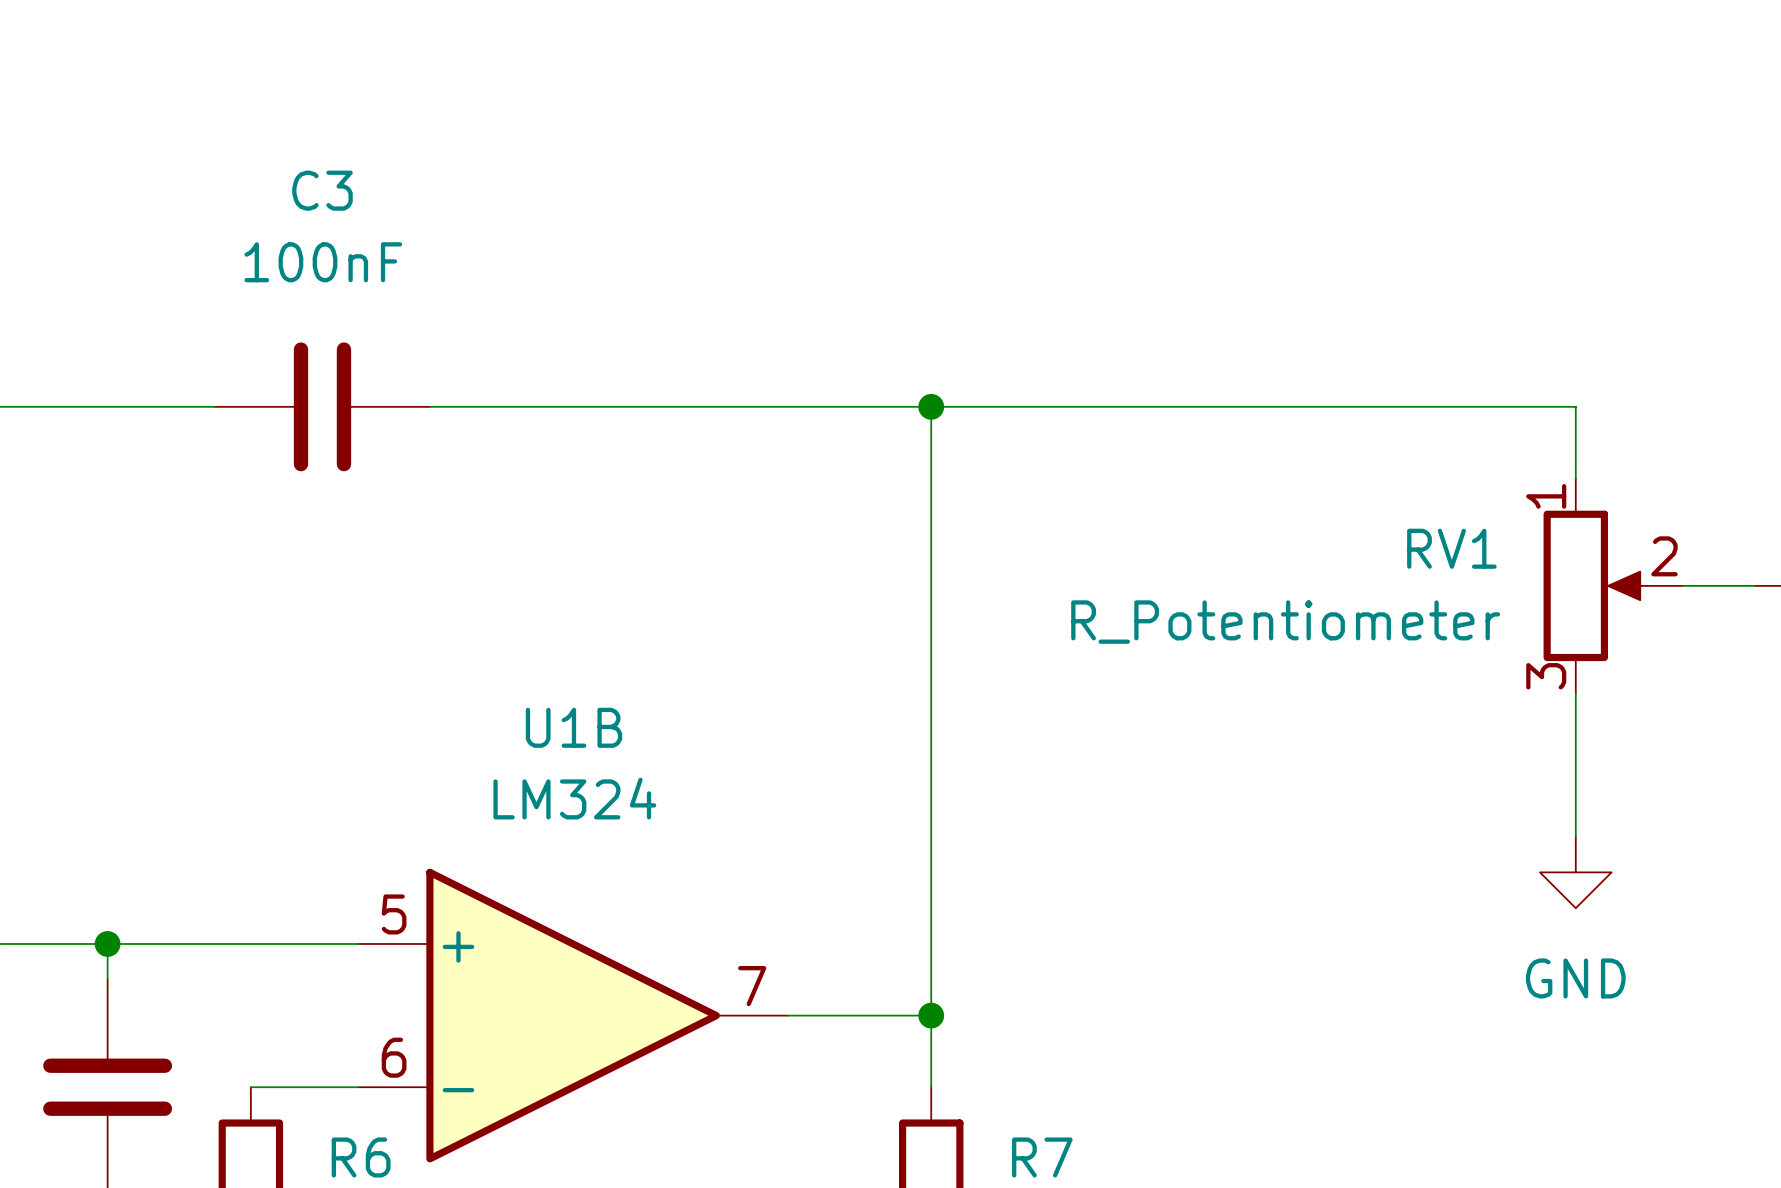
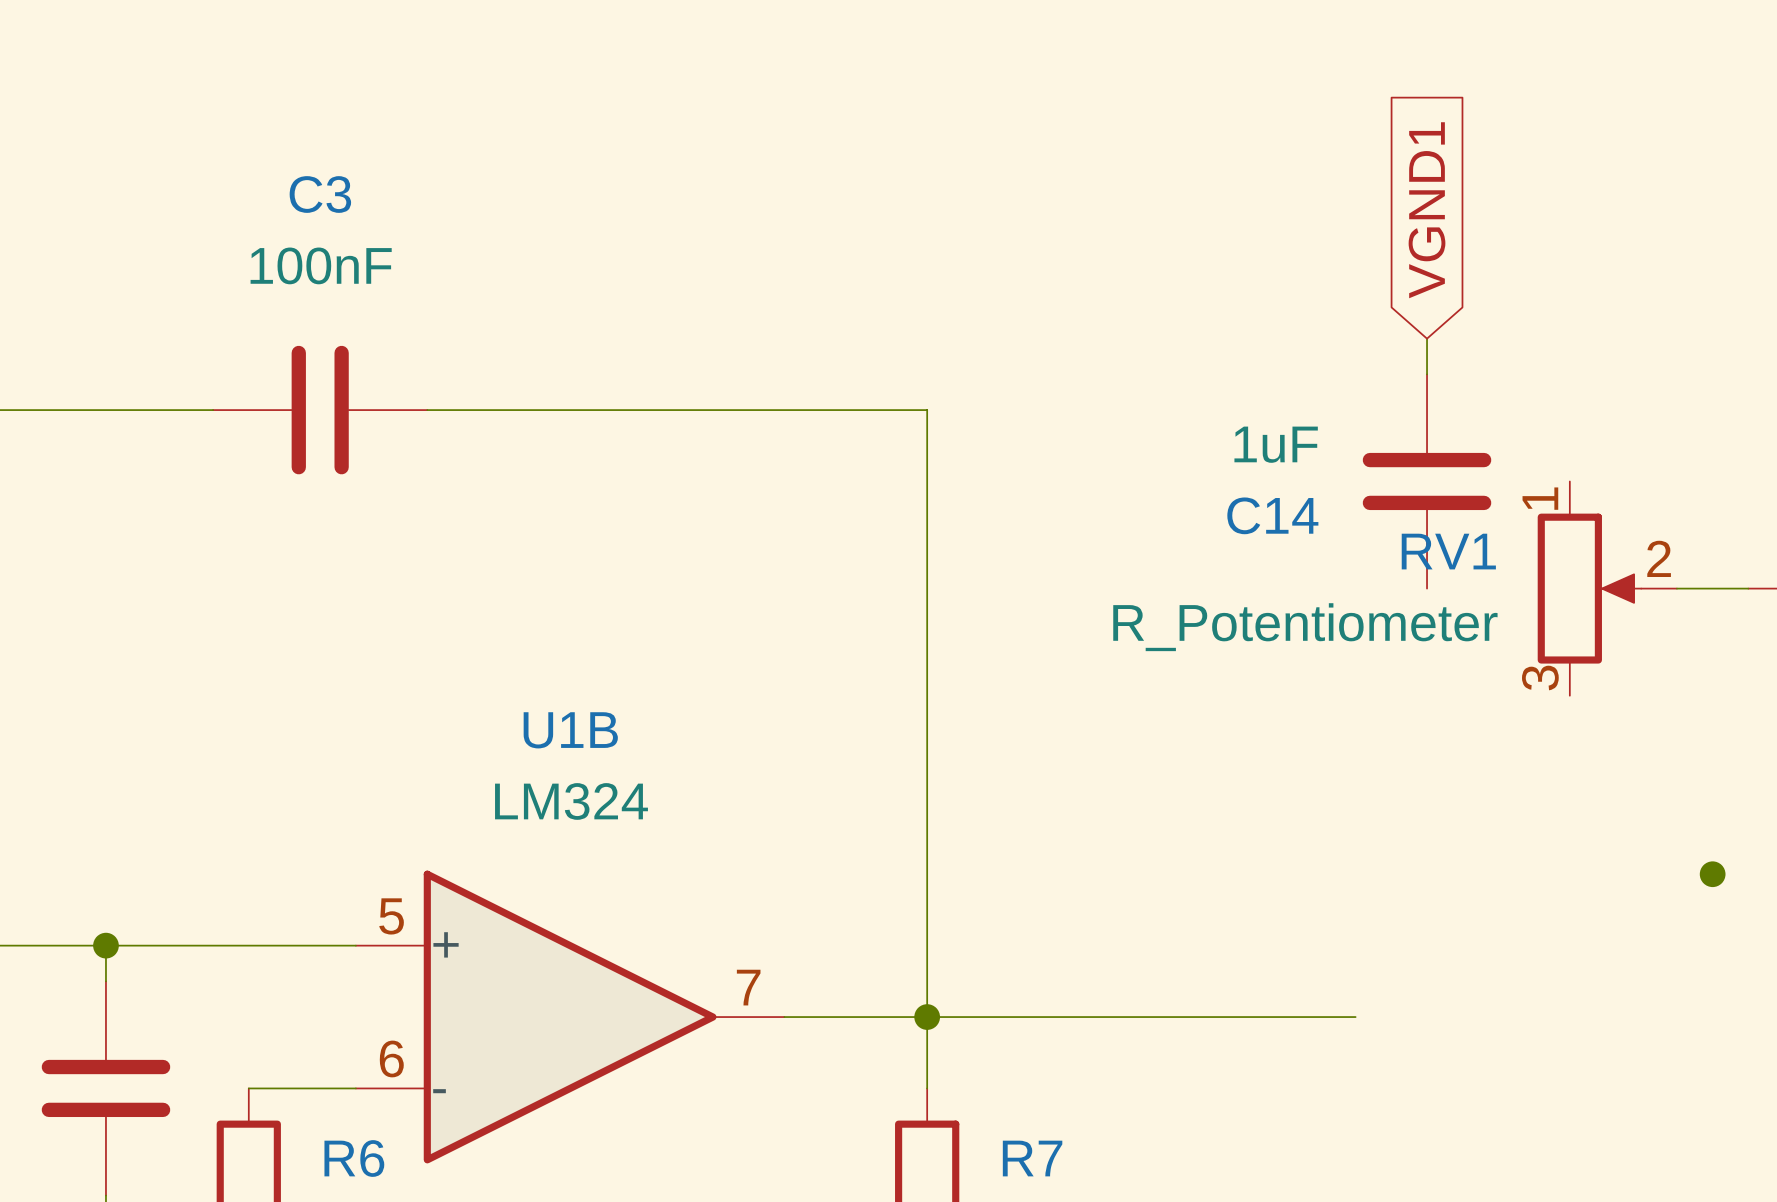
global label: none -> VGND1 (1427, 210)
wire: none -> (1427, 338) (1427, 374)
wire: (931, 406) (1575, 406) (1575, 478) -> none
junction: (931, 406) -> none
C14: none -> 1uF (1427, 481)
wire: (1575, 693) (1575, 836) -> none
power symbol: GND (1575, 872) -> none
junction: none -> (1712, 874)
wire: none -> (927, 1017) (1355, 1017)

